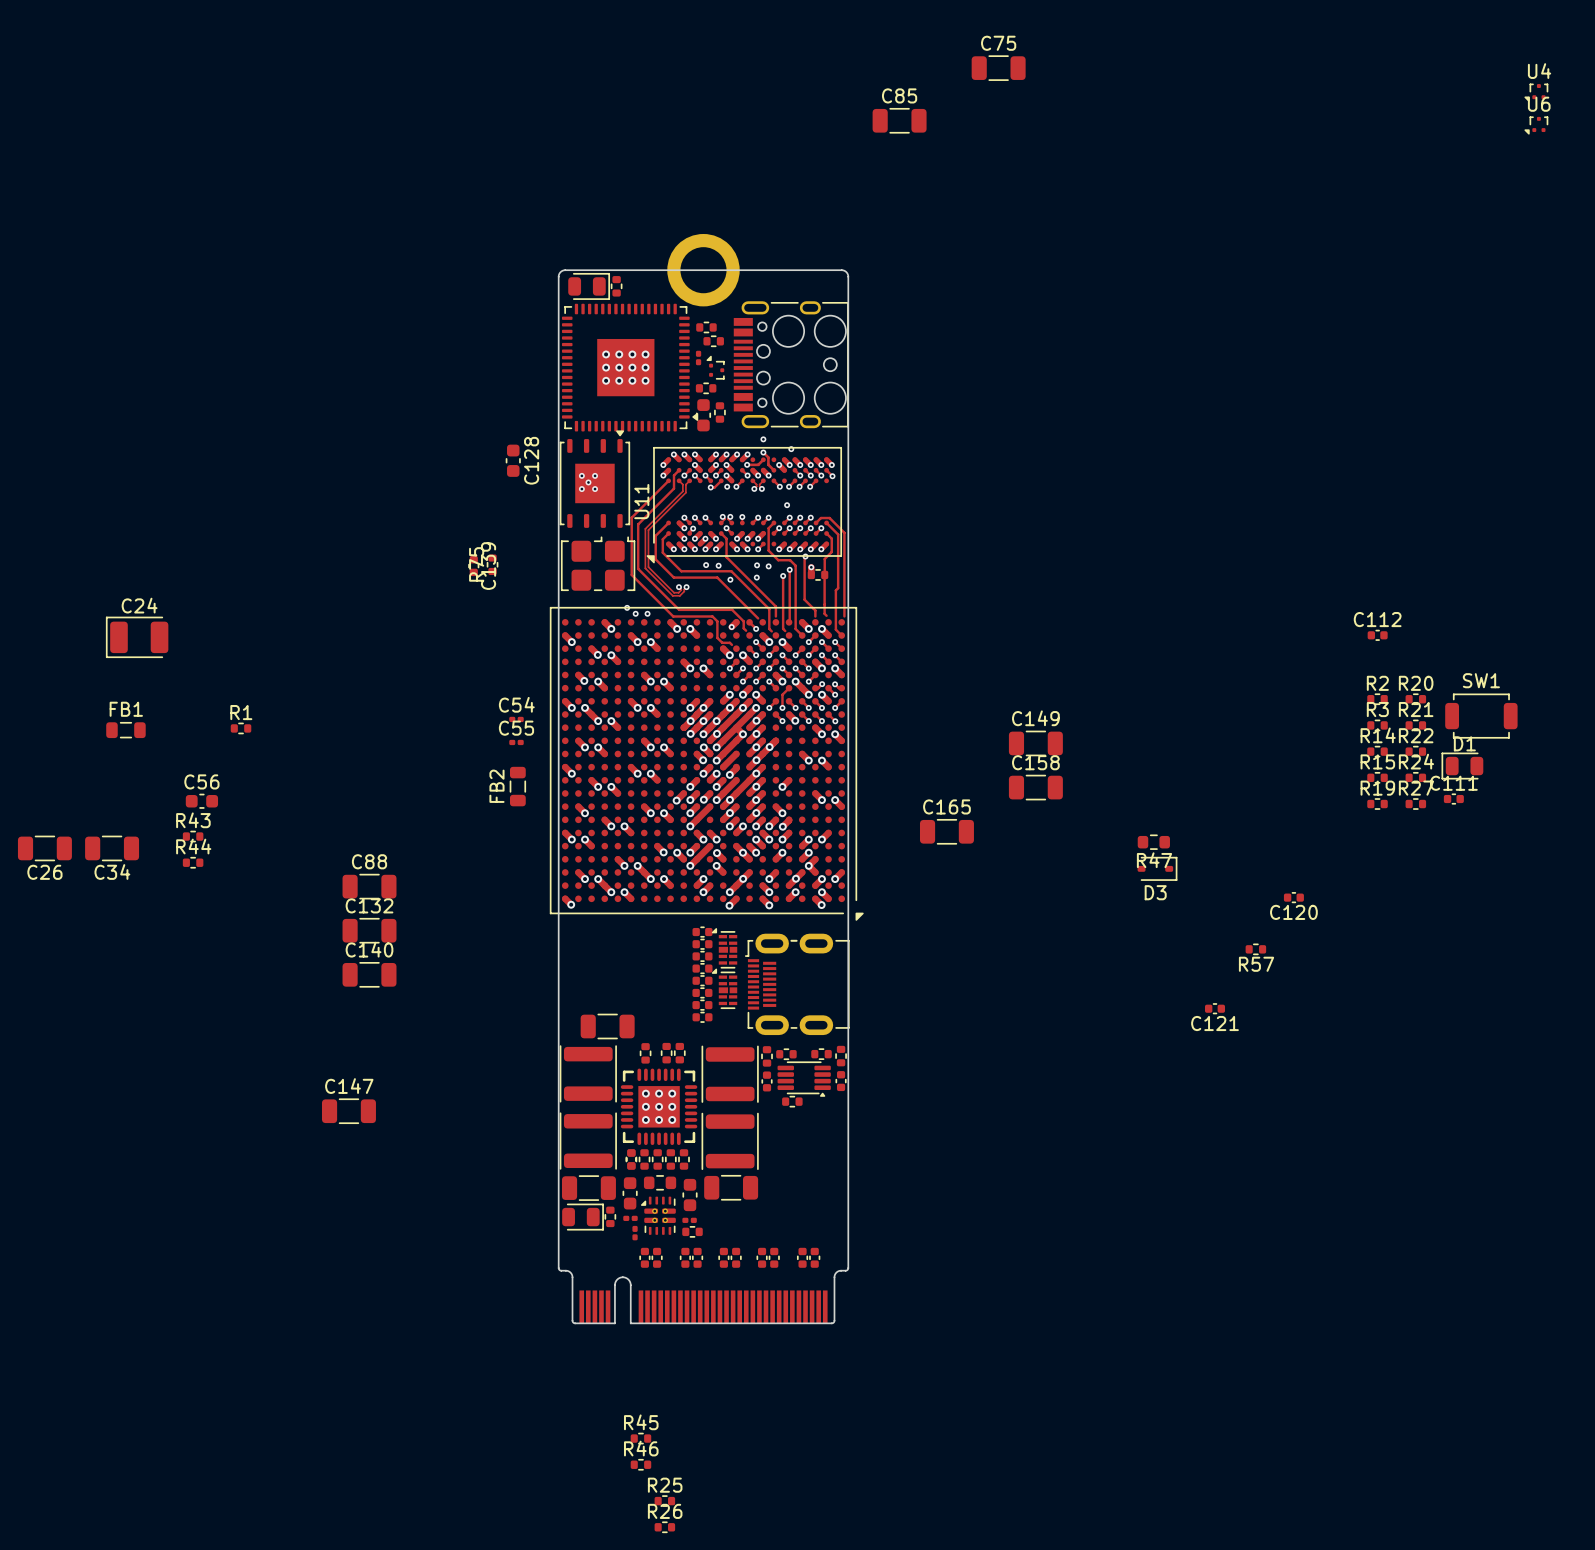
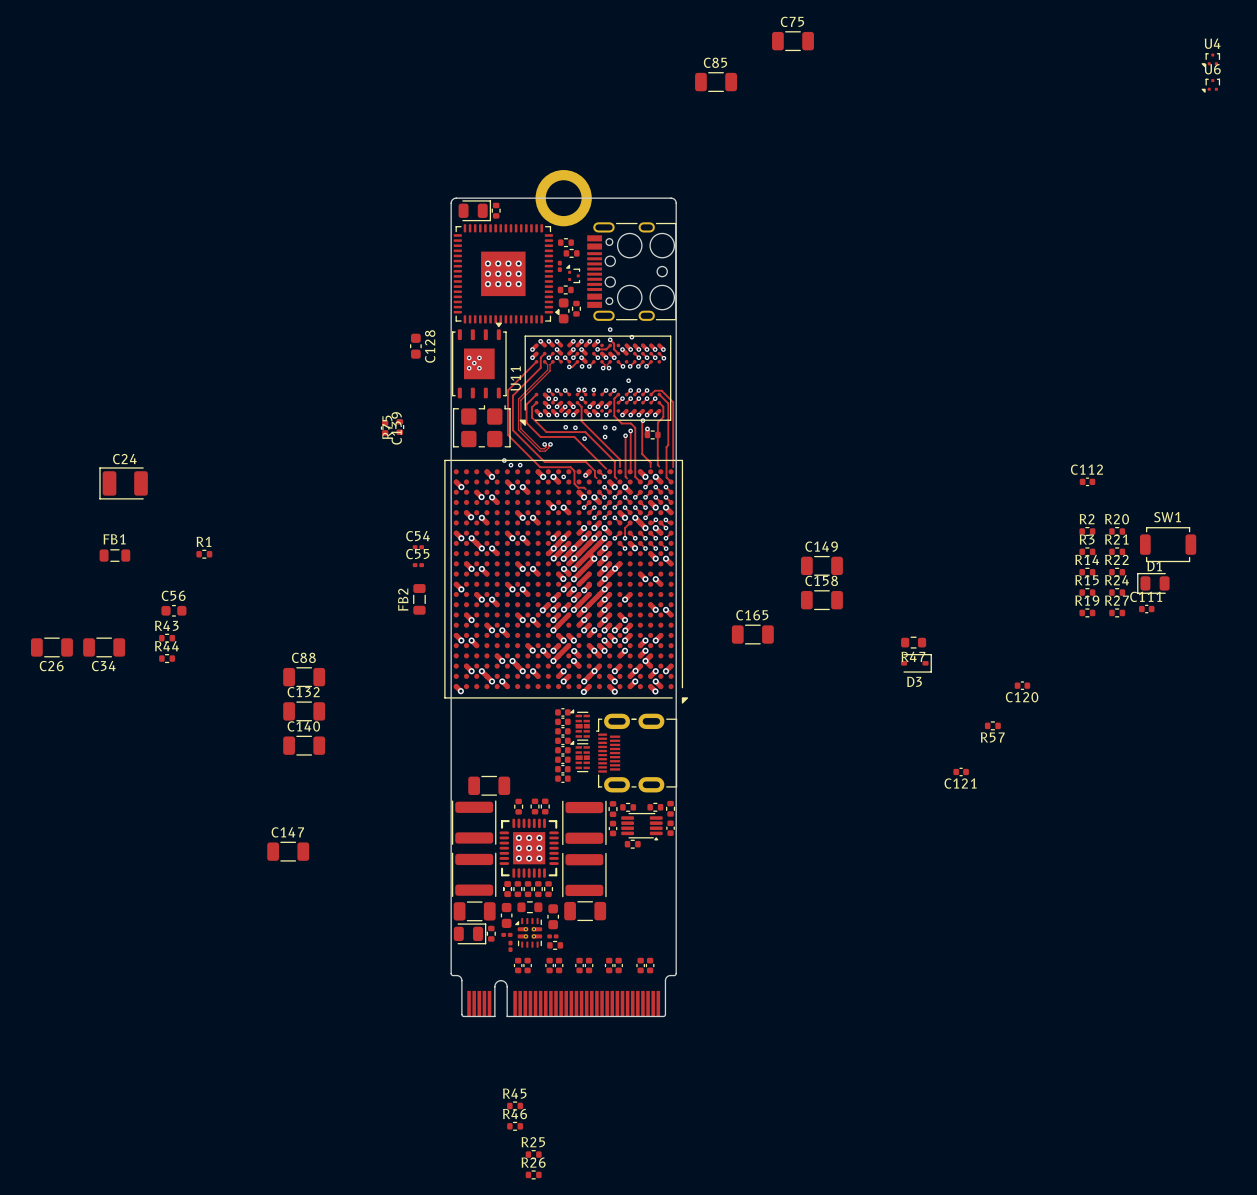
via: none -> (563, 476)

